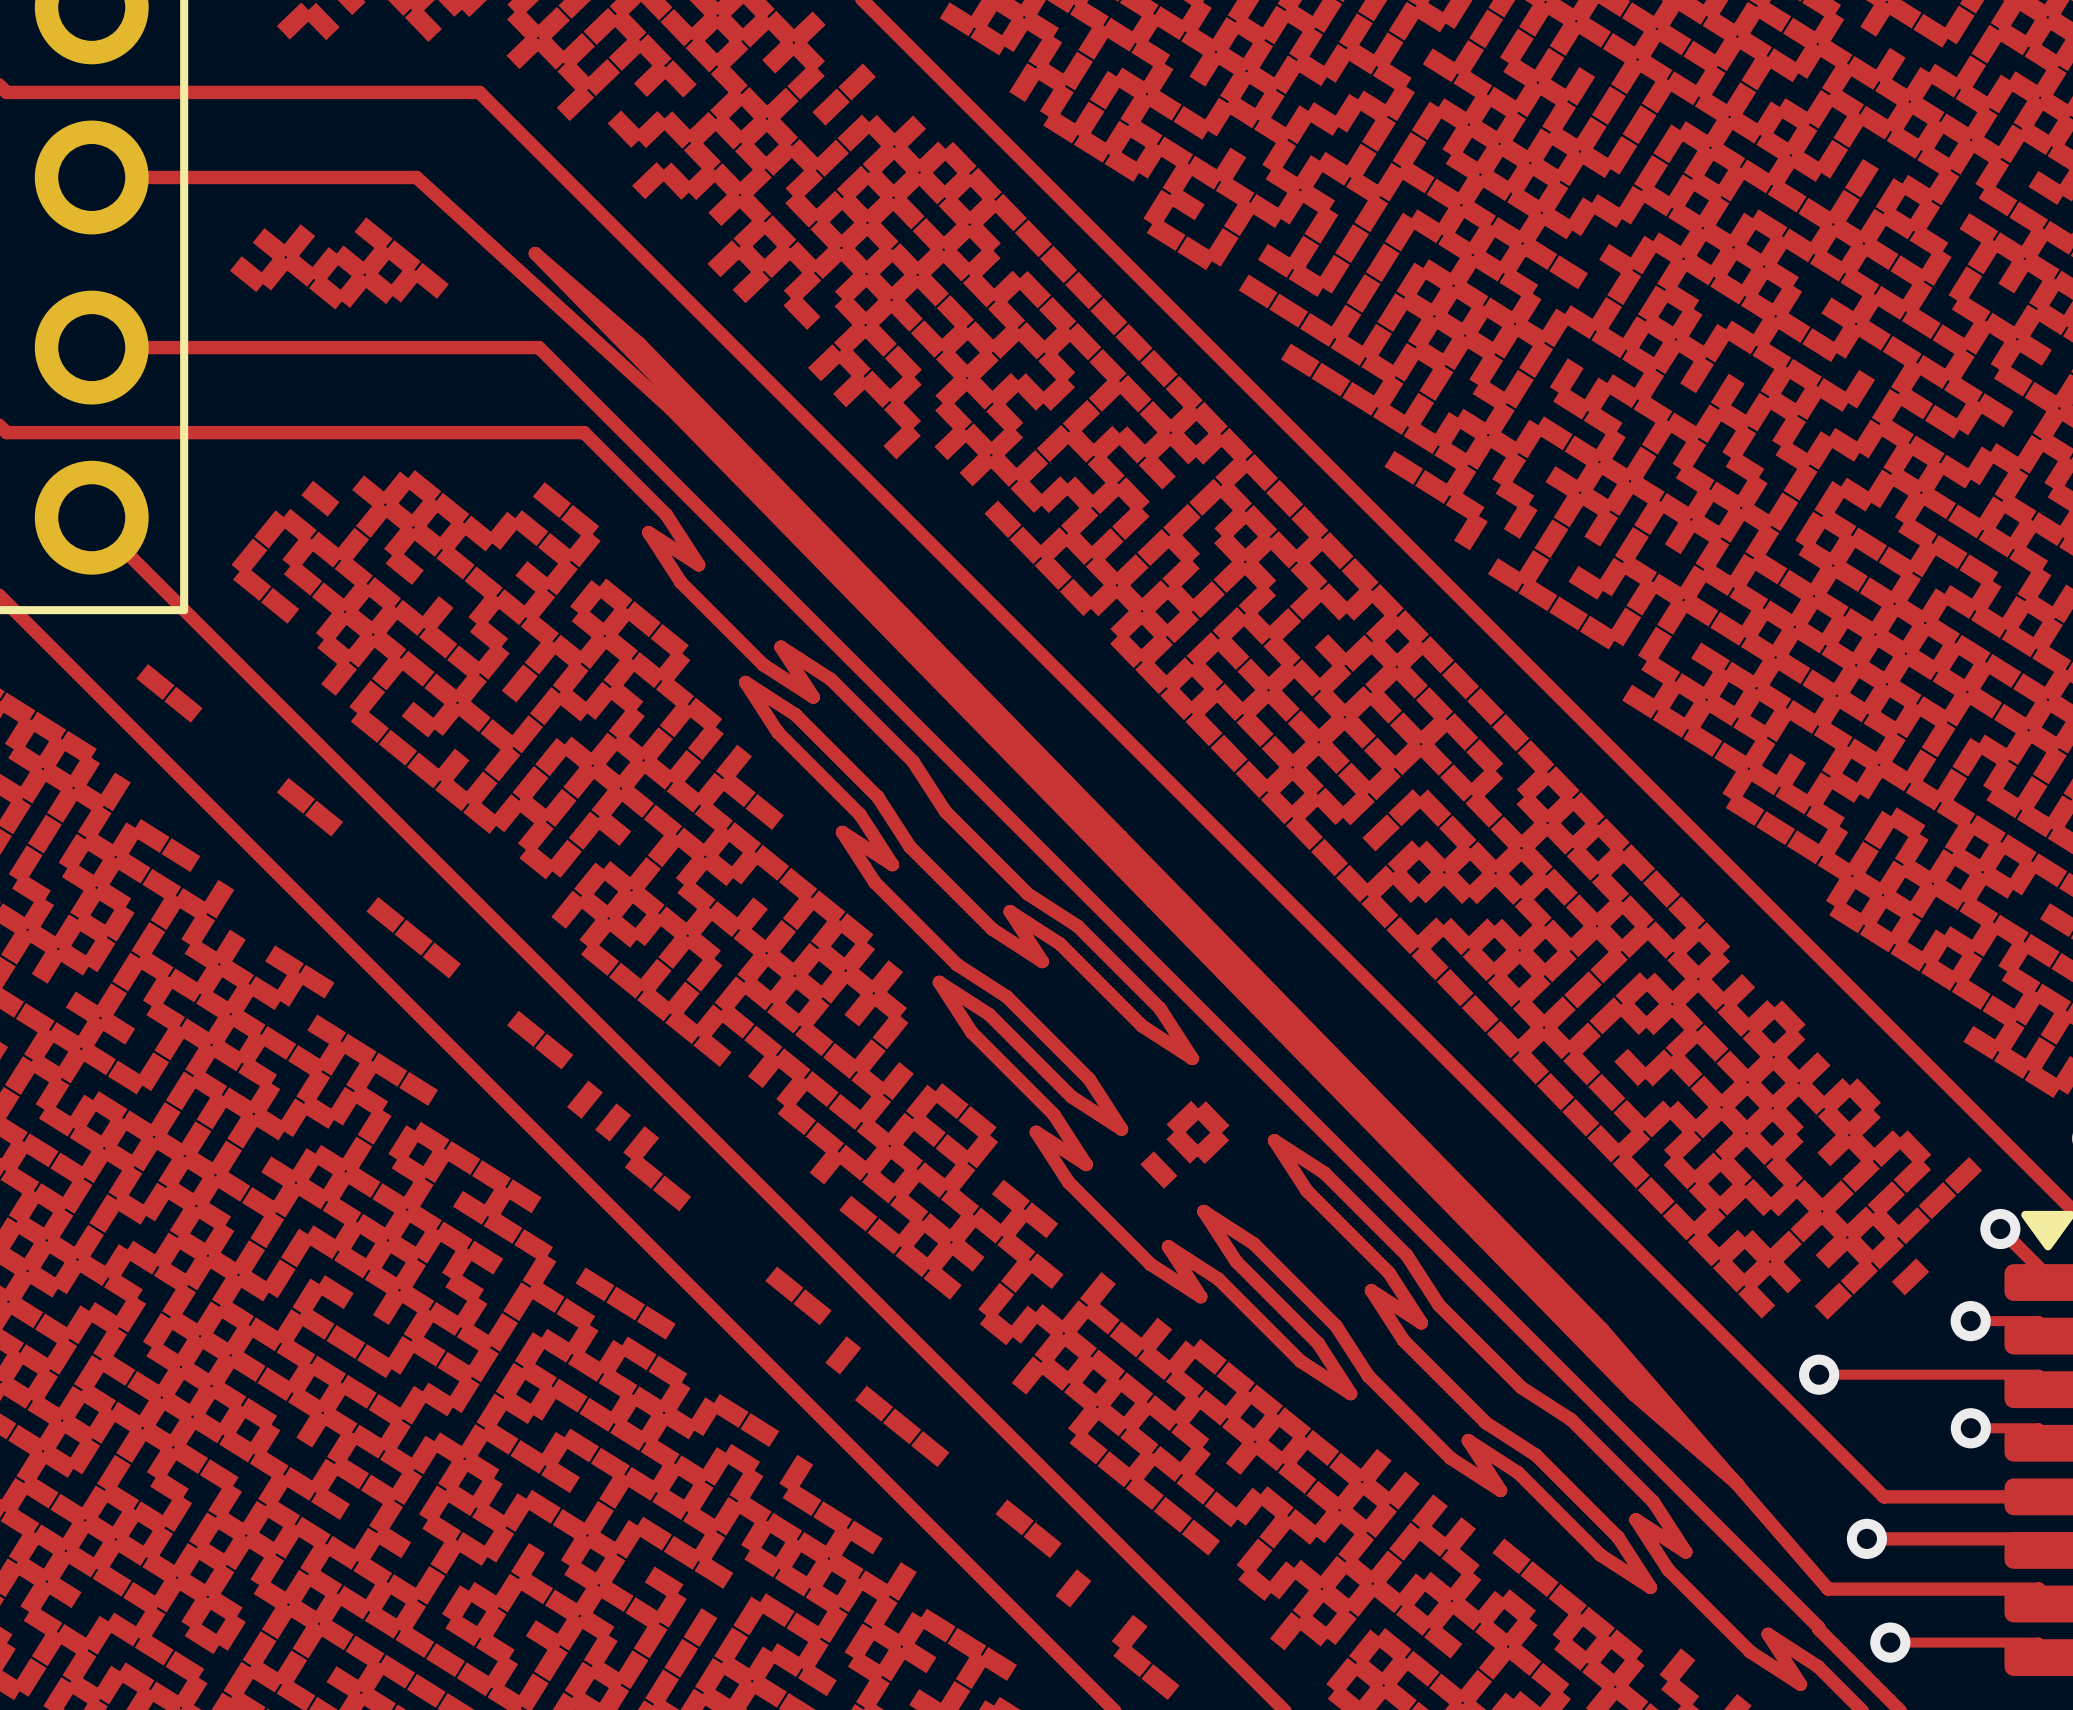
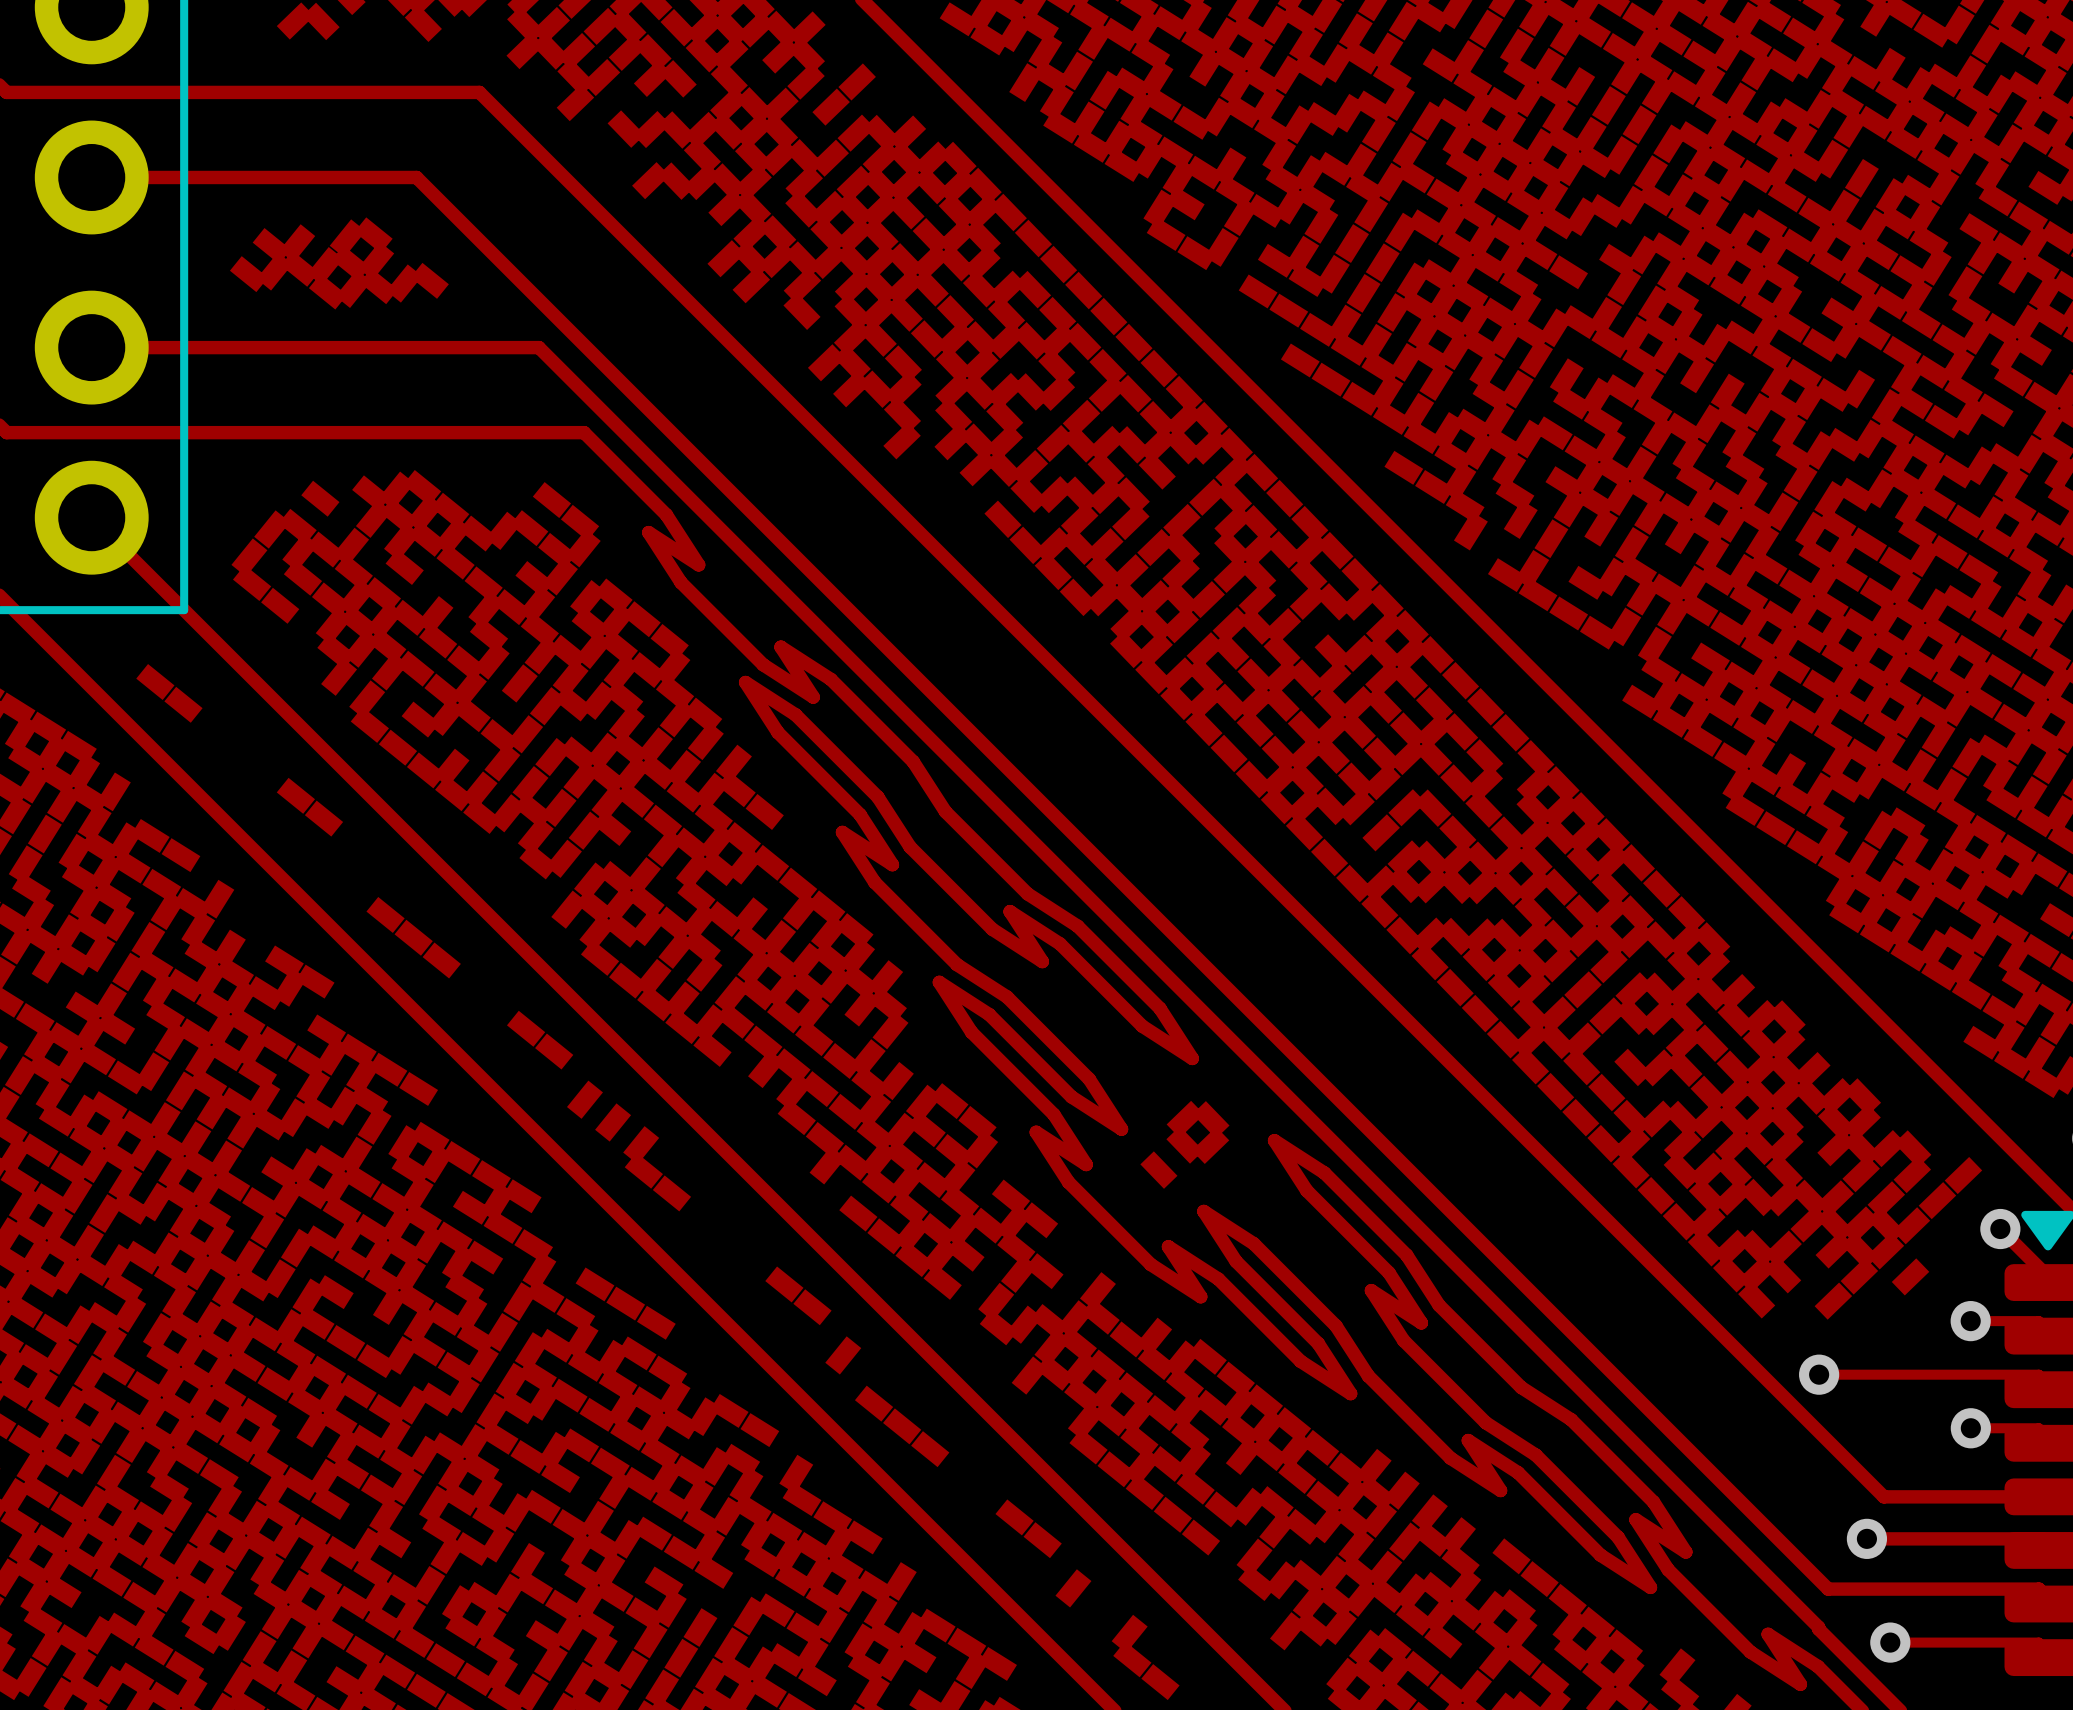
track: (416, 177) (671, 409) (1633, 1394) (1737, 1484) (535, 253) (639, 343) (1601, 1328) (1828, 1589) -> (416, 177) (1828, 1589)
drawing: none -> [329, 219, 366, 258]
drawing: [382, 240, 421, 277] -> none

